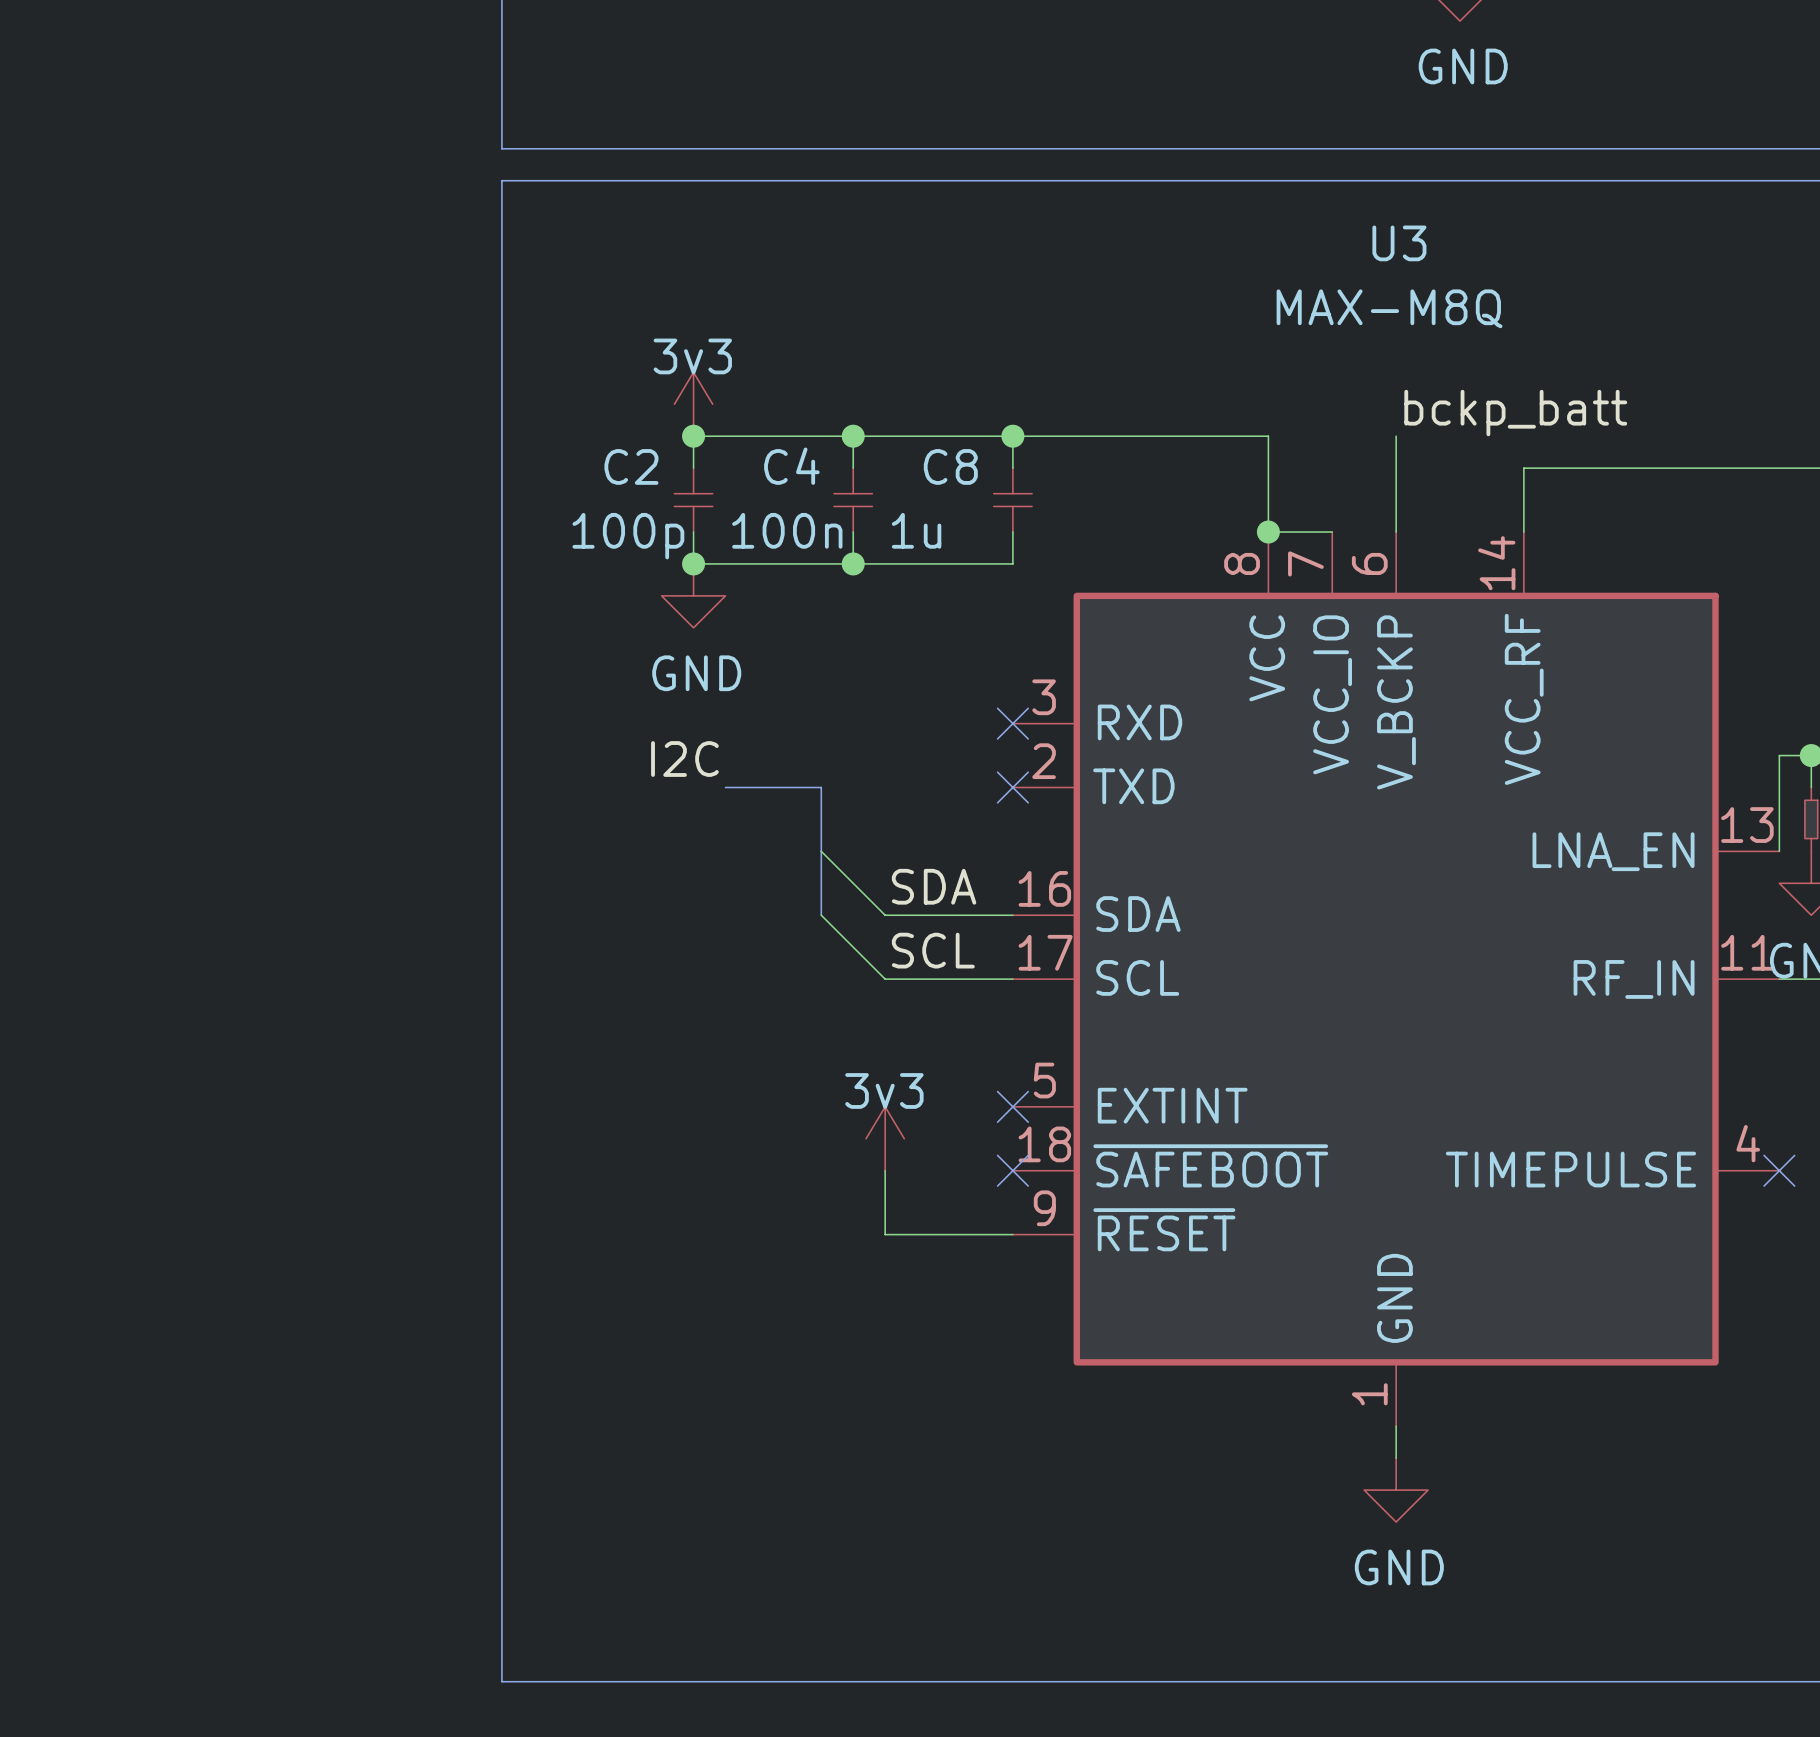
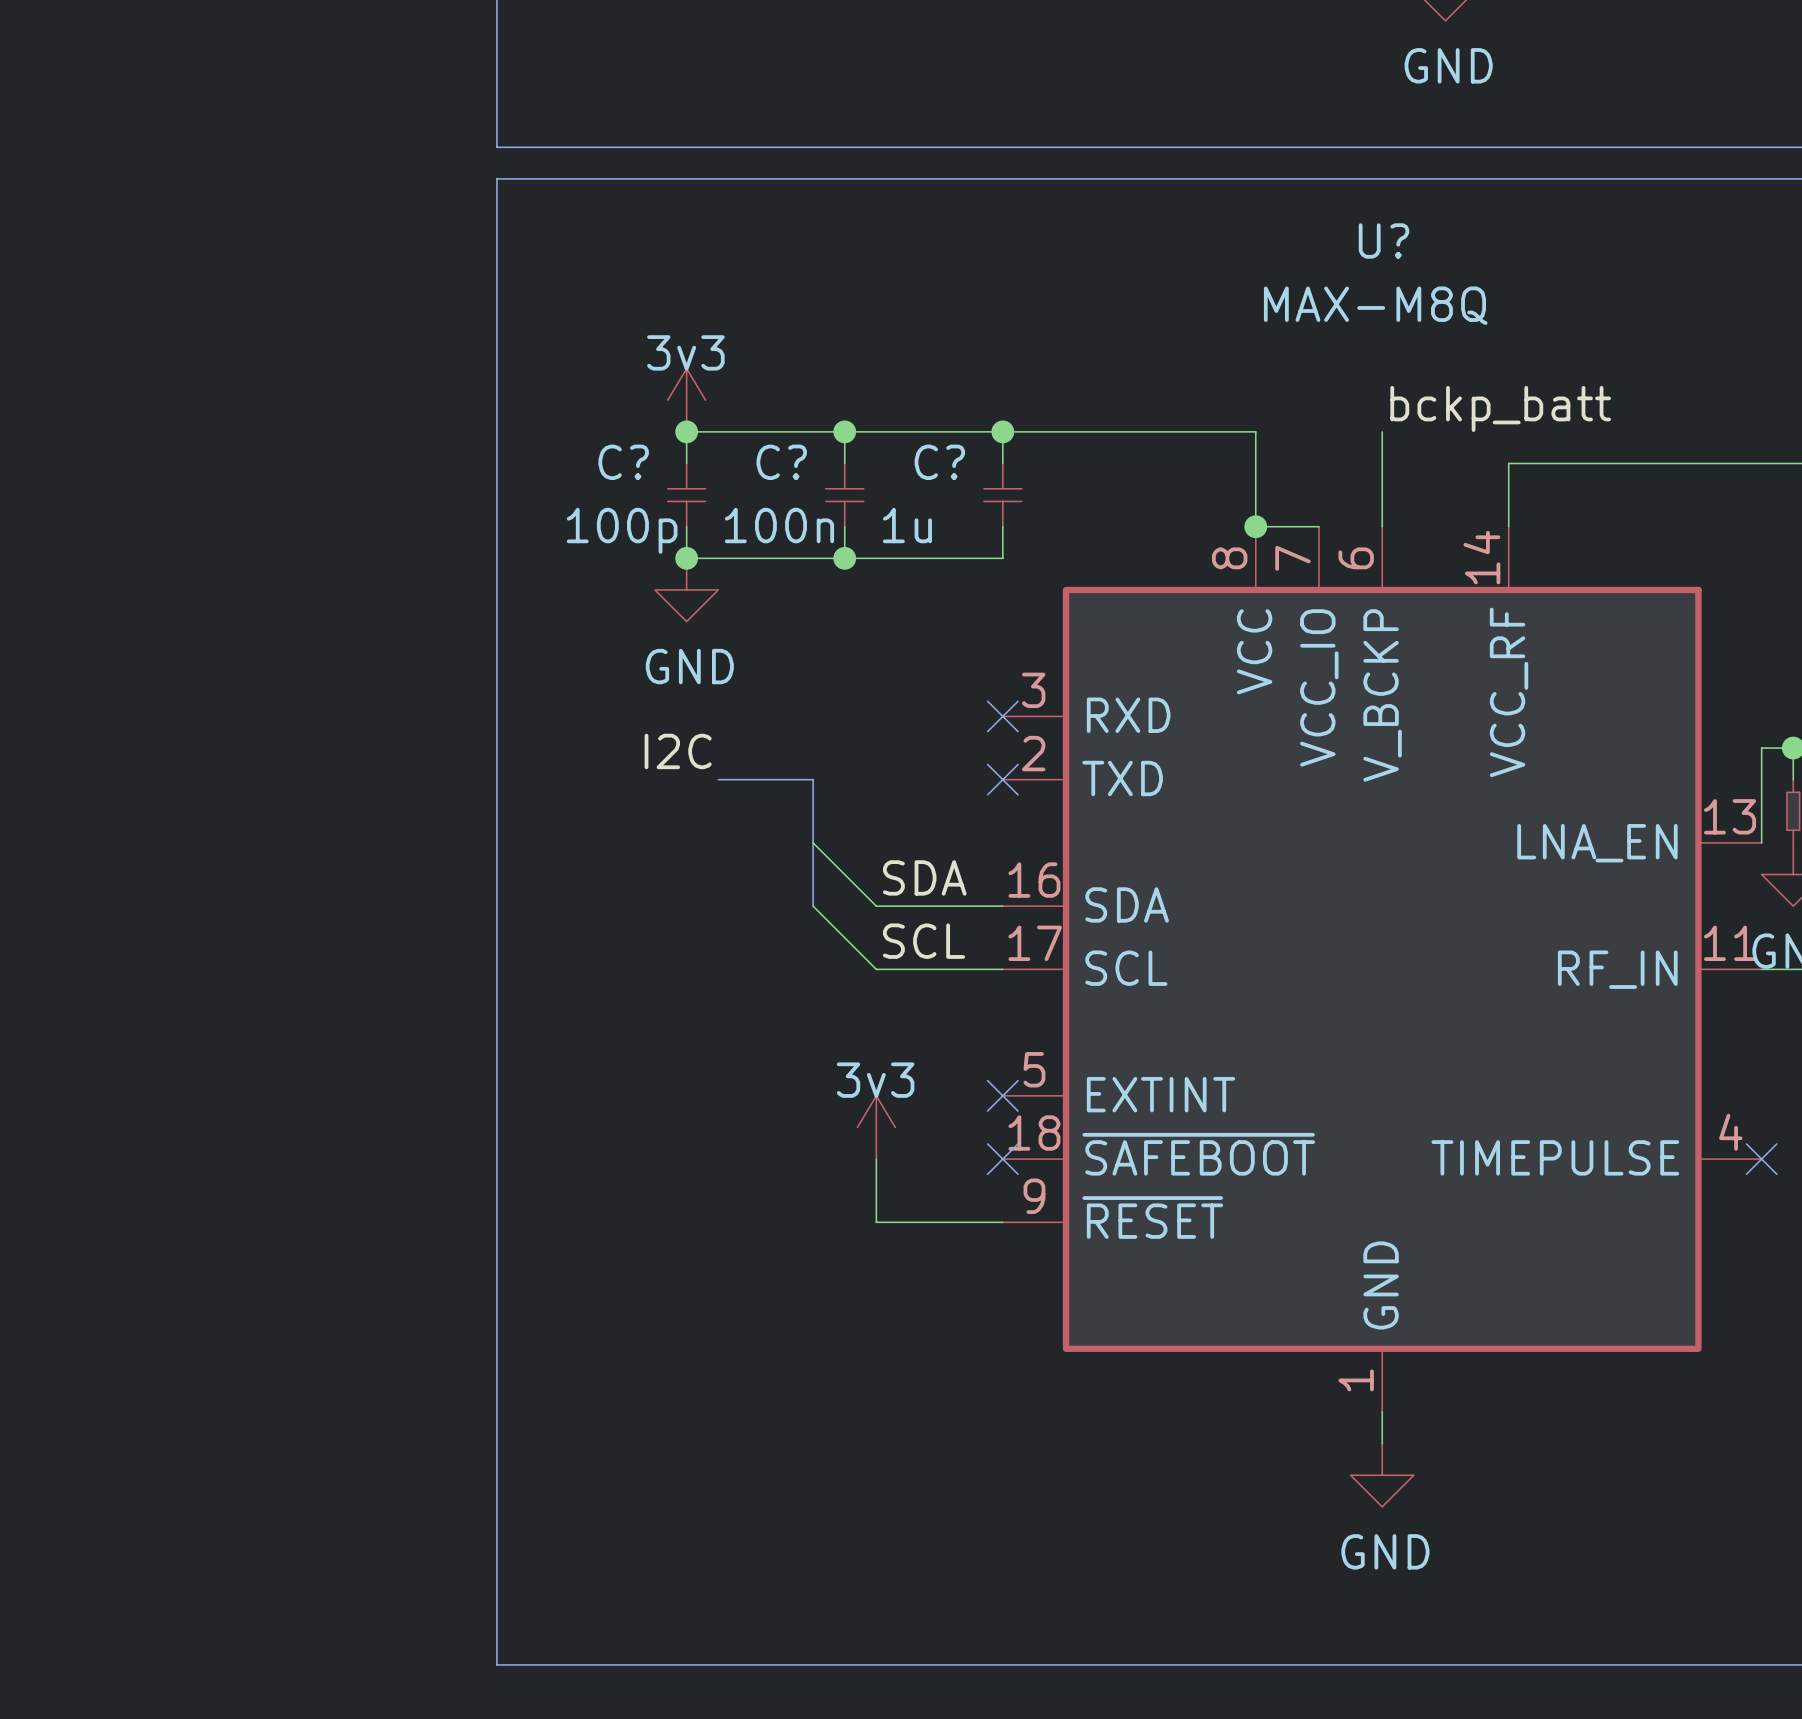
U3 name: U3 (1399, 243) -> U? (1383, 240)
C2 name: C2 (631, 466) -> C? (623, 462)
C4 name: C4 (791, 466) -> C? (781, 462)
C8 name: C8 (950, 466) -> C? (939, 462)

